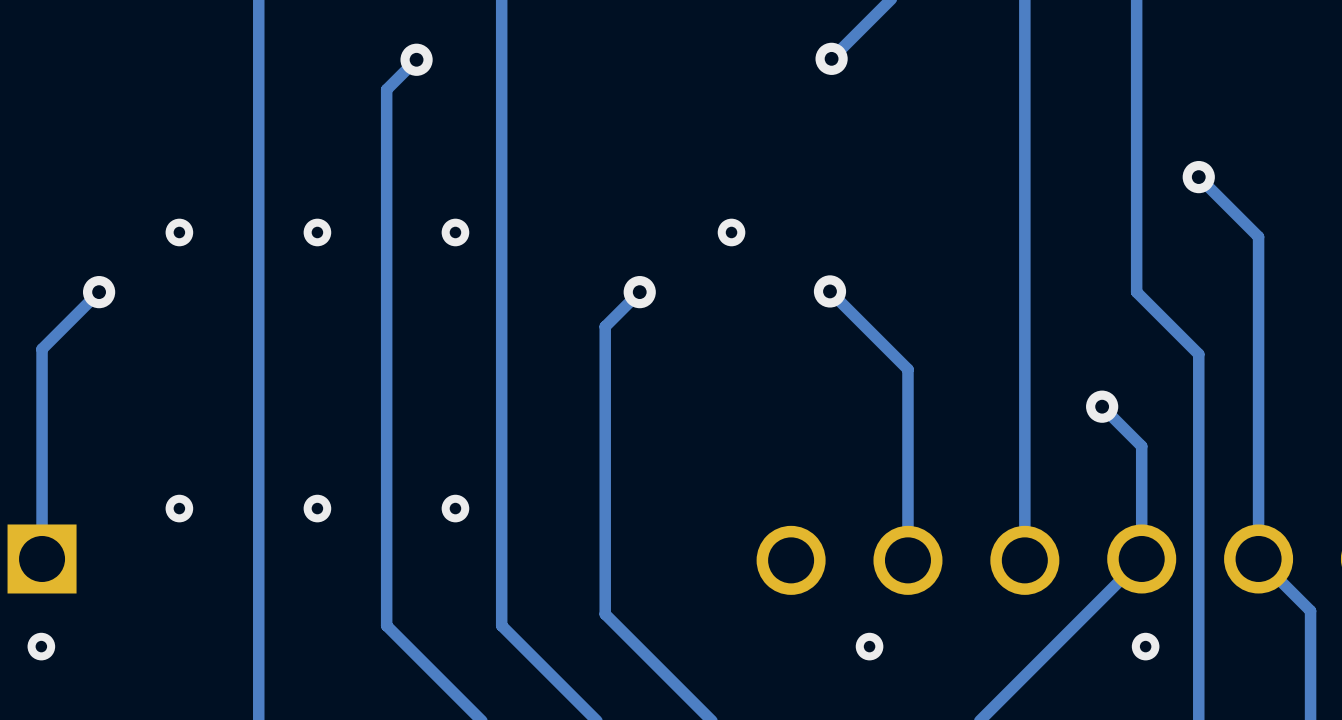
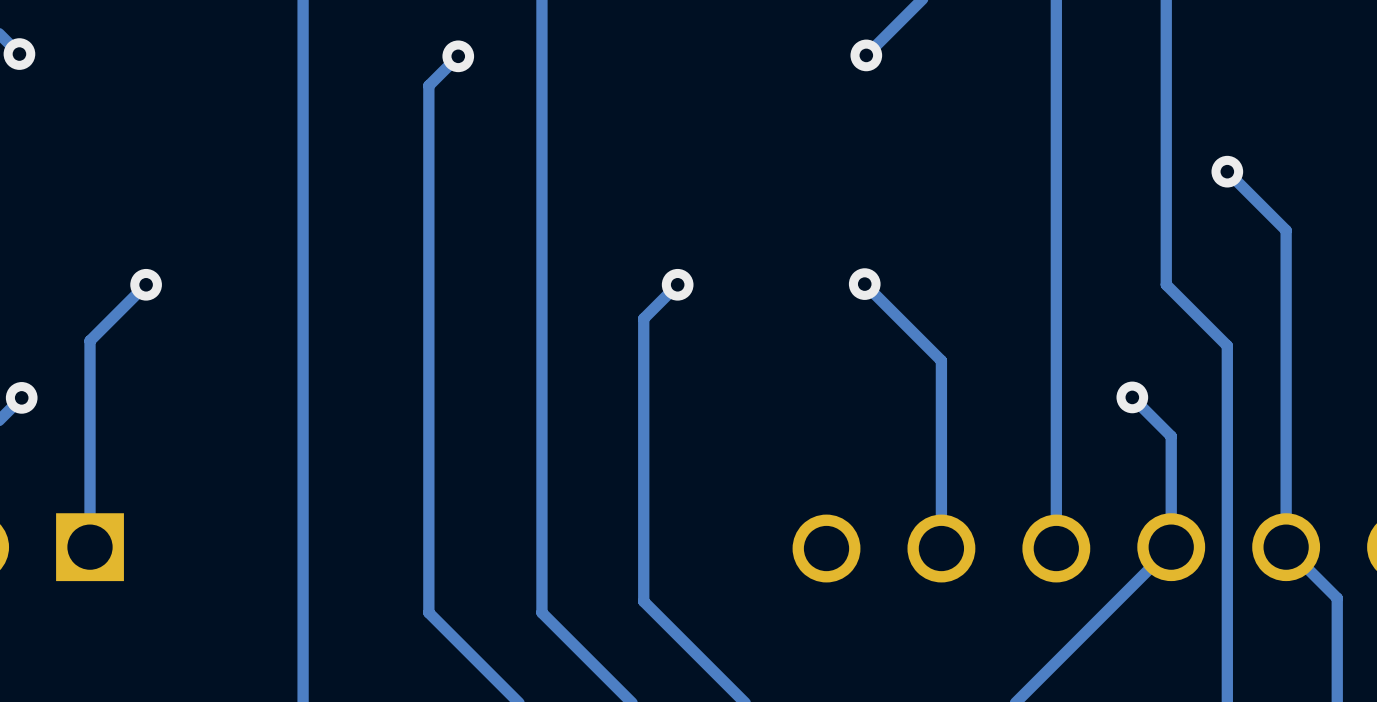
via: (179, 232) -> none
via: (317, 232) -> none
via: (455, 232) -> none
via: (731, 232) -> none
via: (179, 508) -> none
via: (317, 508) -> none
via: (455, 508) -> none
via: (41, 646) -> none
via: (869, 646) -> none
via: (1145, 646) -> none

